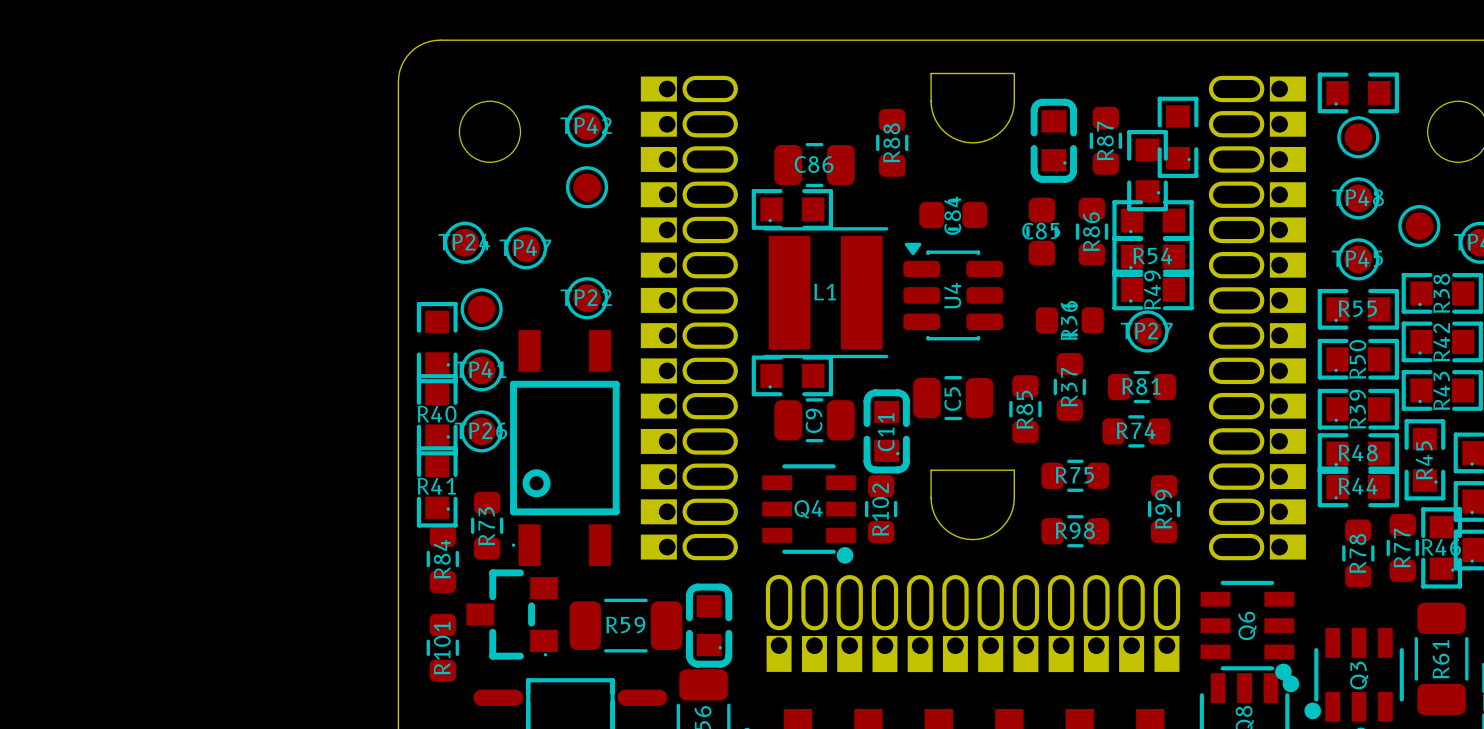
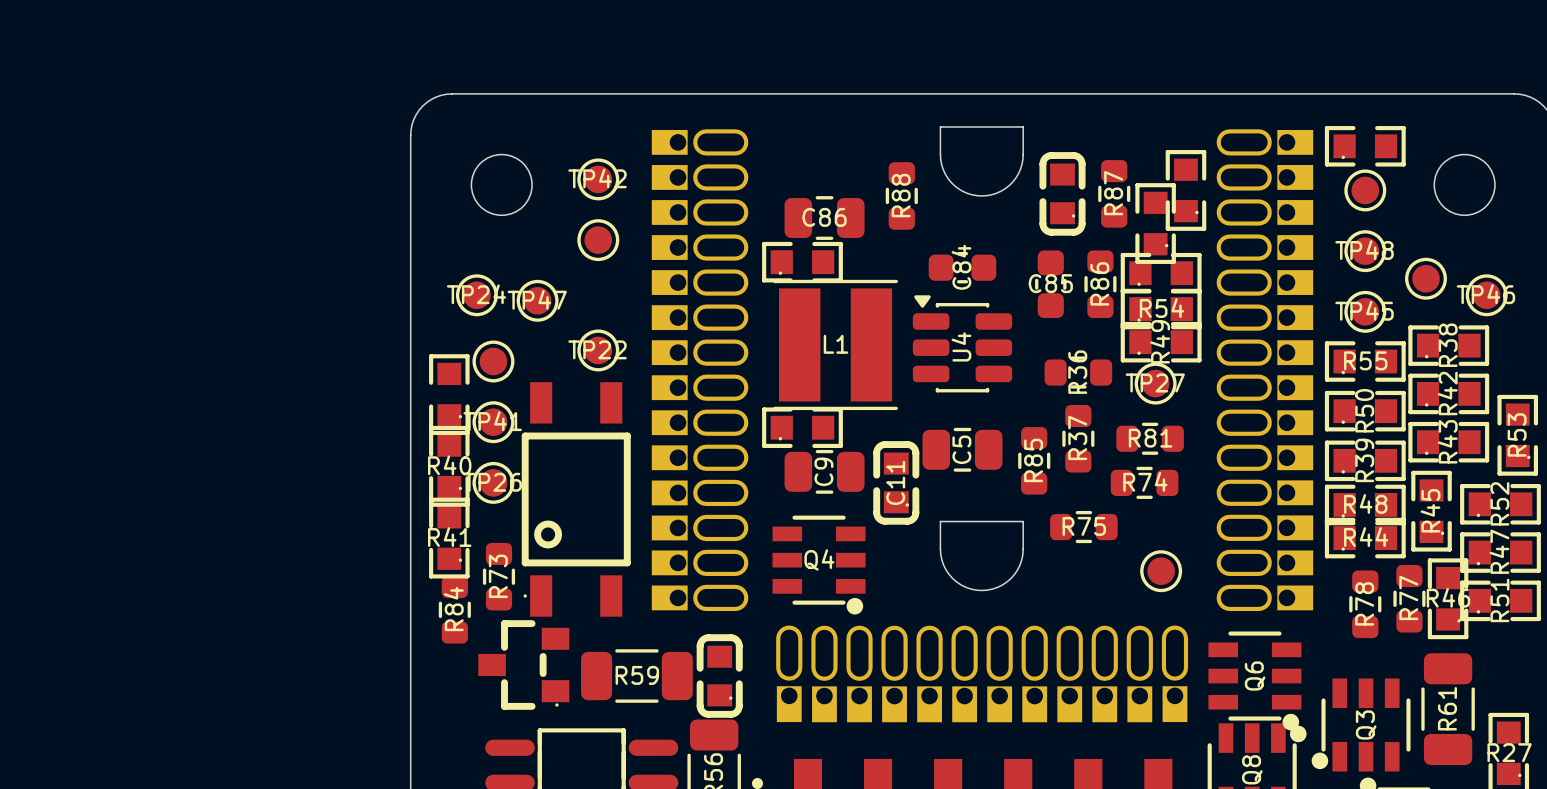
R102: (881, 509) -> none
R99: (1164, 509) -> none
part: none -> (1161, 571)
R98: (1075, 531) -> none
R101: (442, 647) -> none

